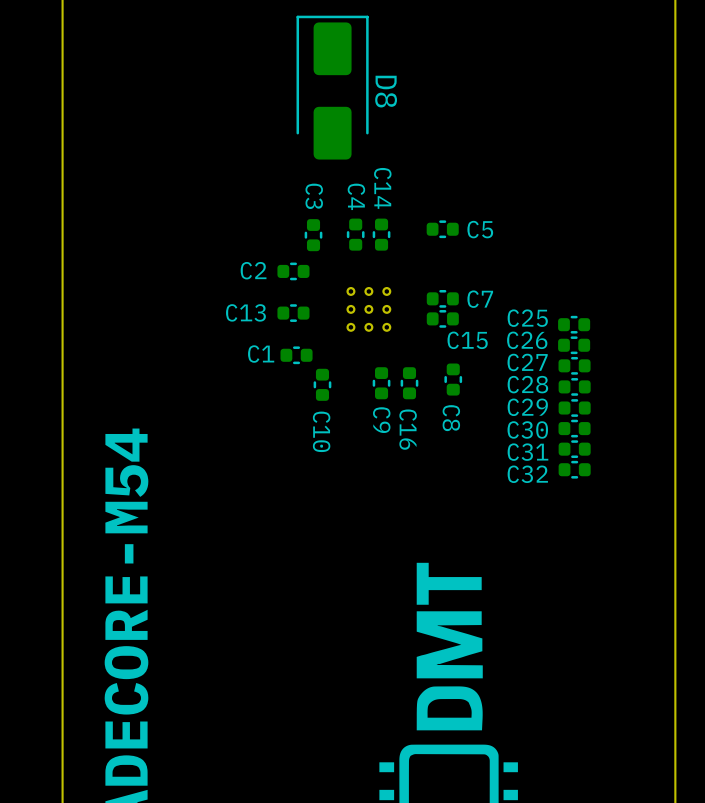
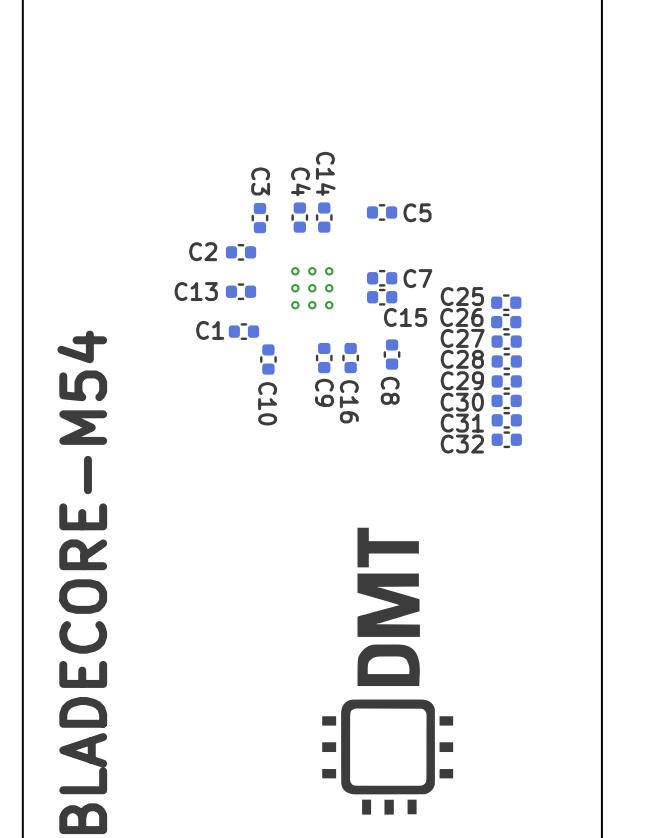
D8: (332, 87) -> none

